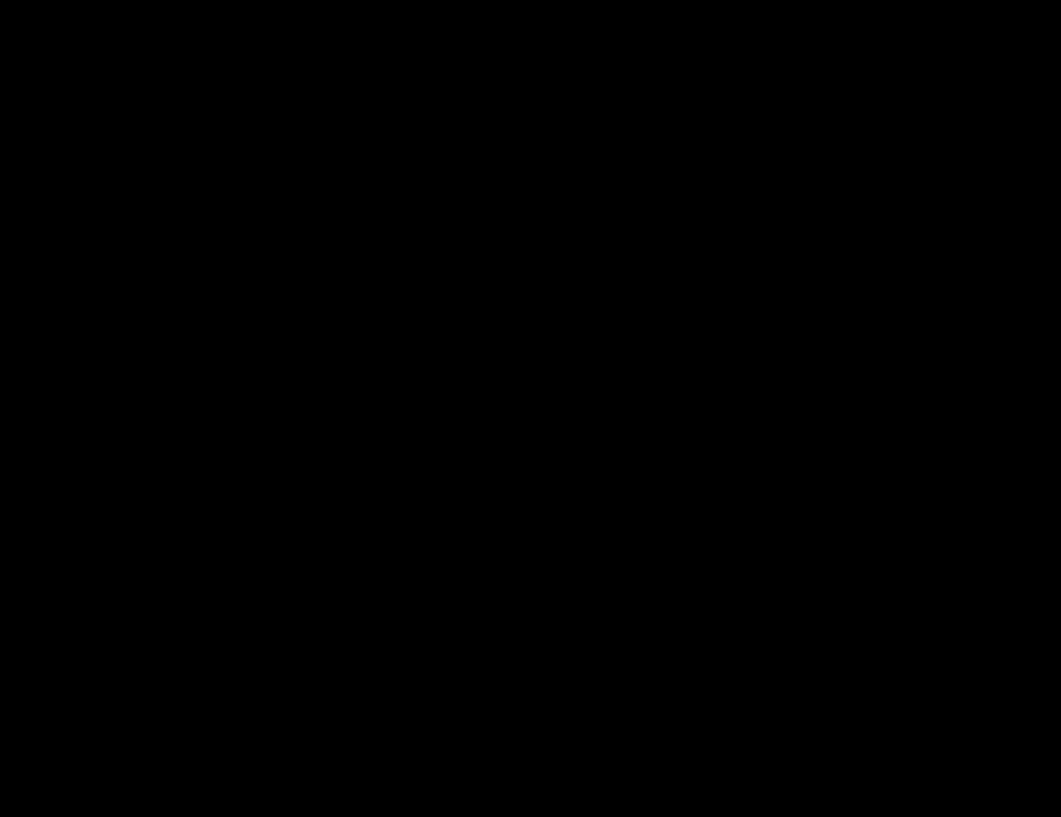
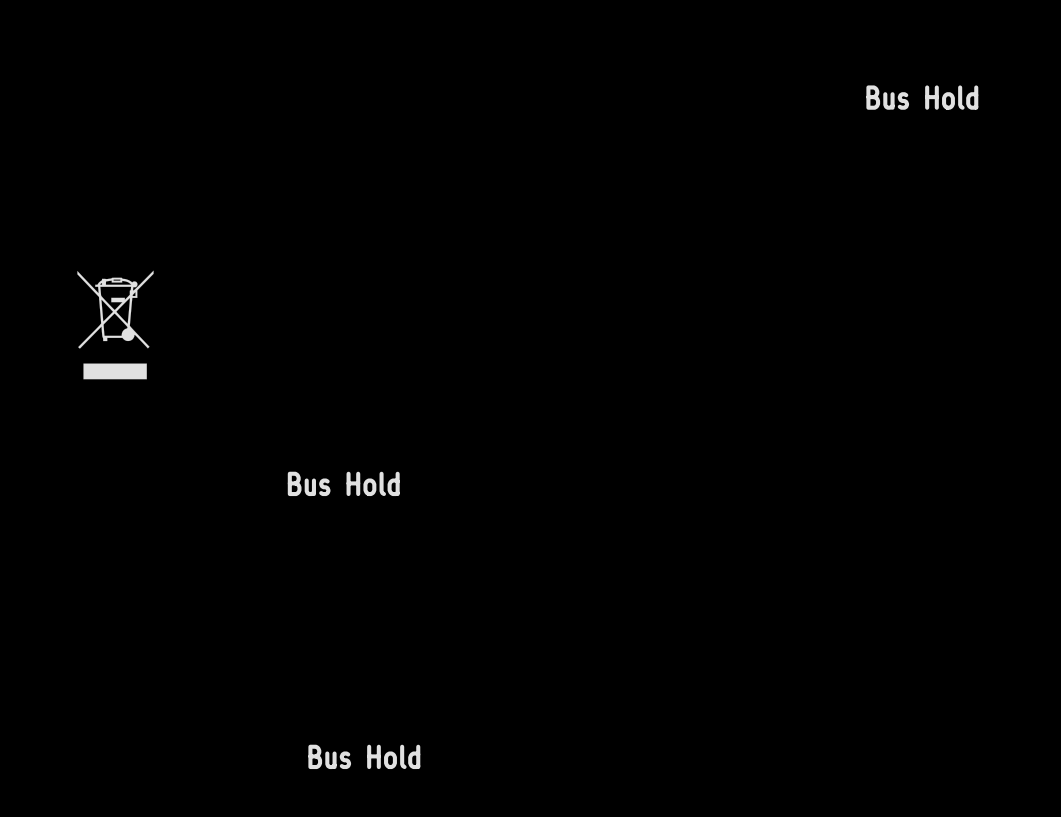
text: none -> Bus Hold (922, 97)
drawing: none -> [77, 270, 154, 380]
text: none -> Bus Hold (343, 483)
text: none -> Bus Hold (364, 756)

